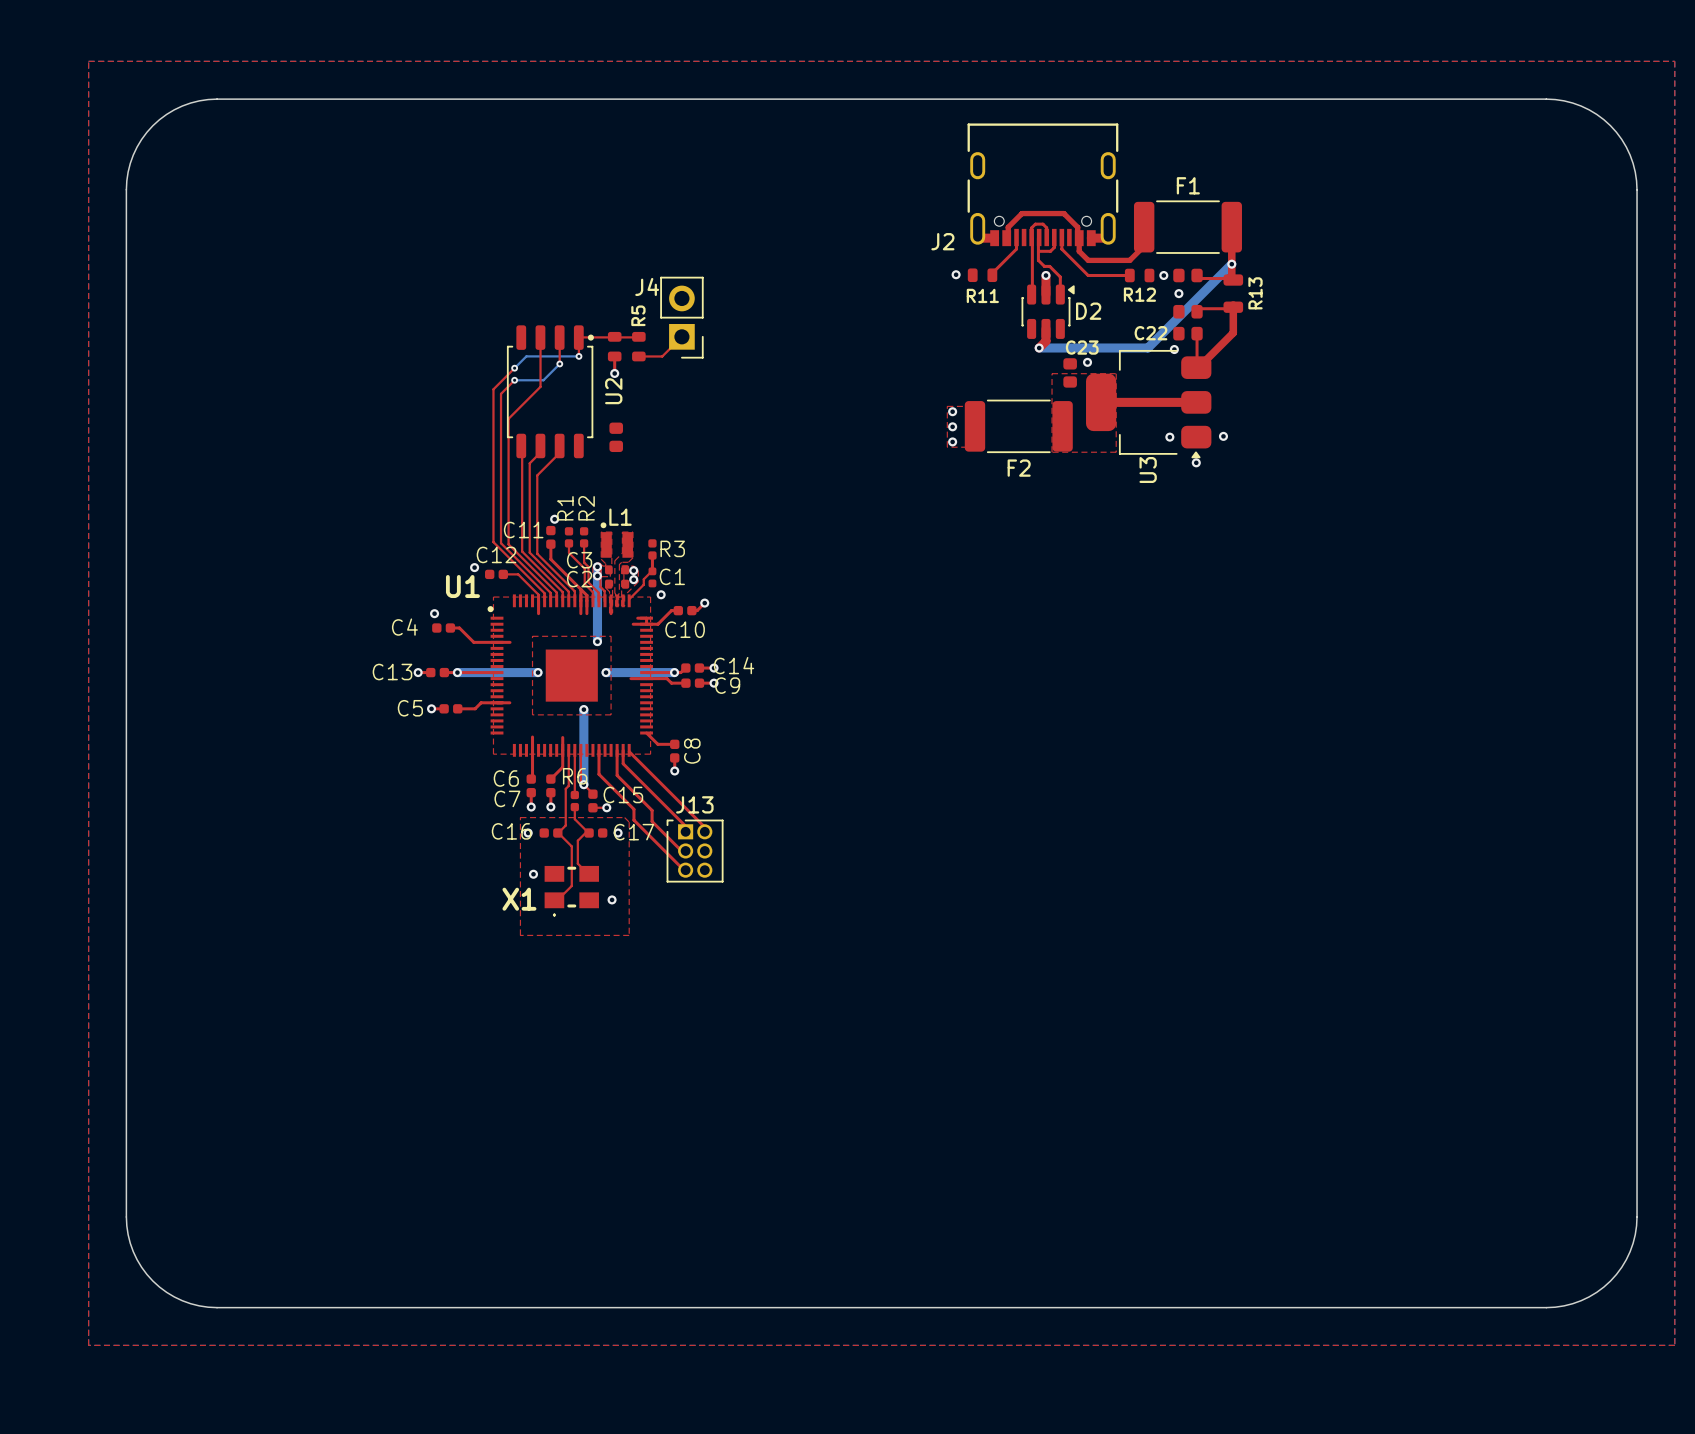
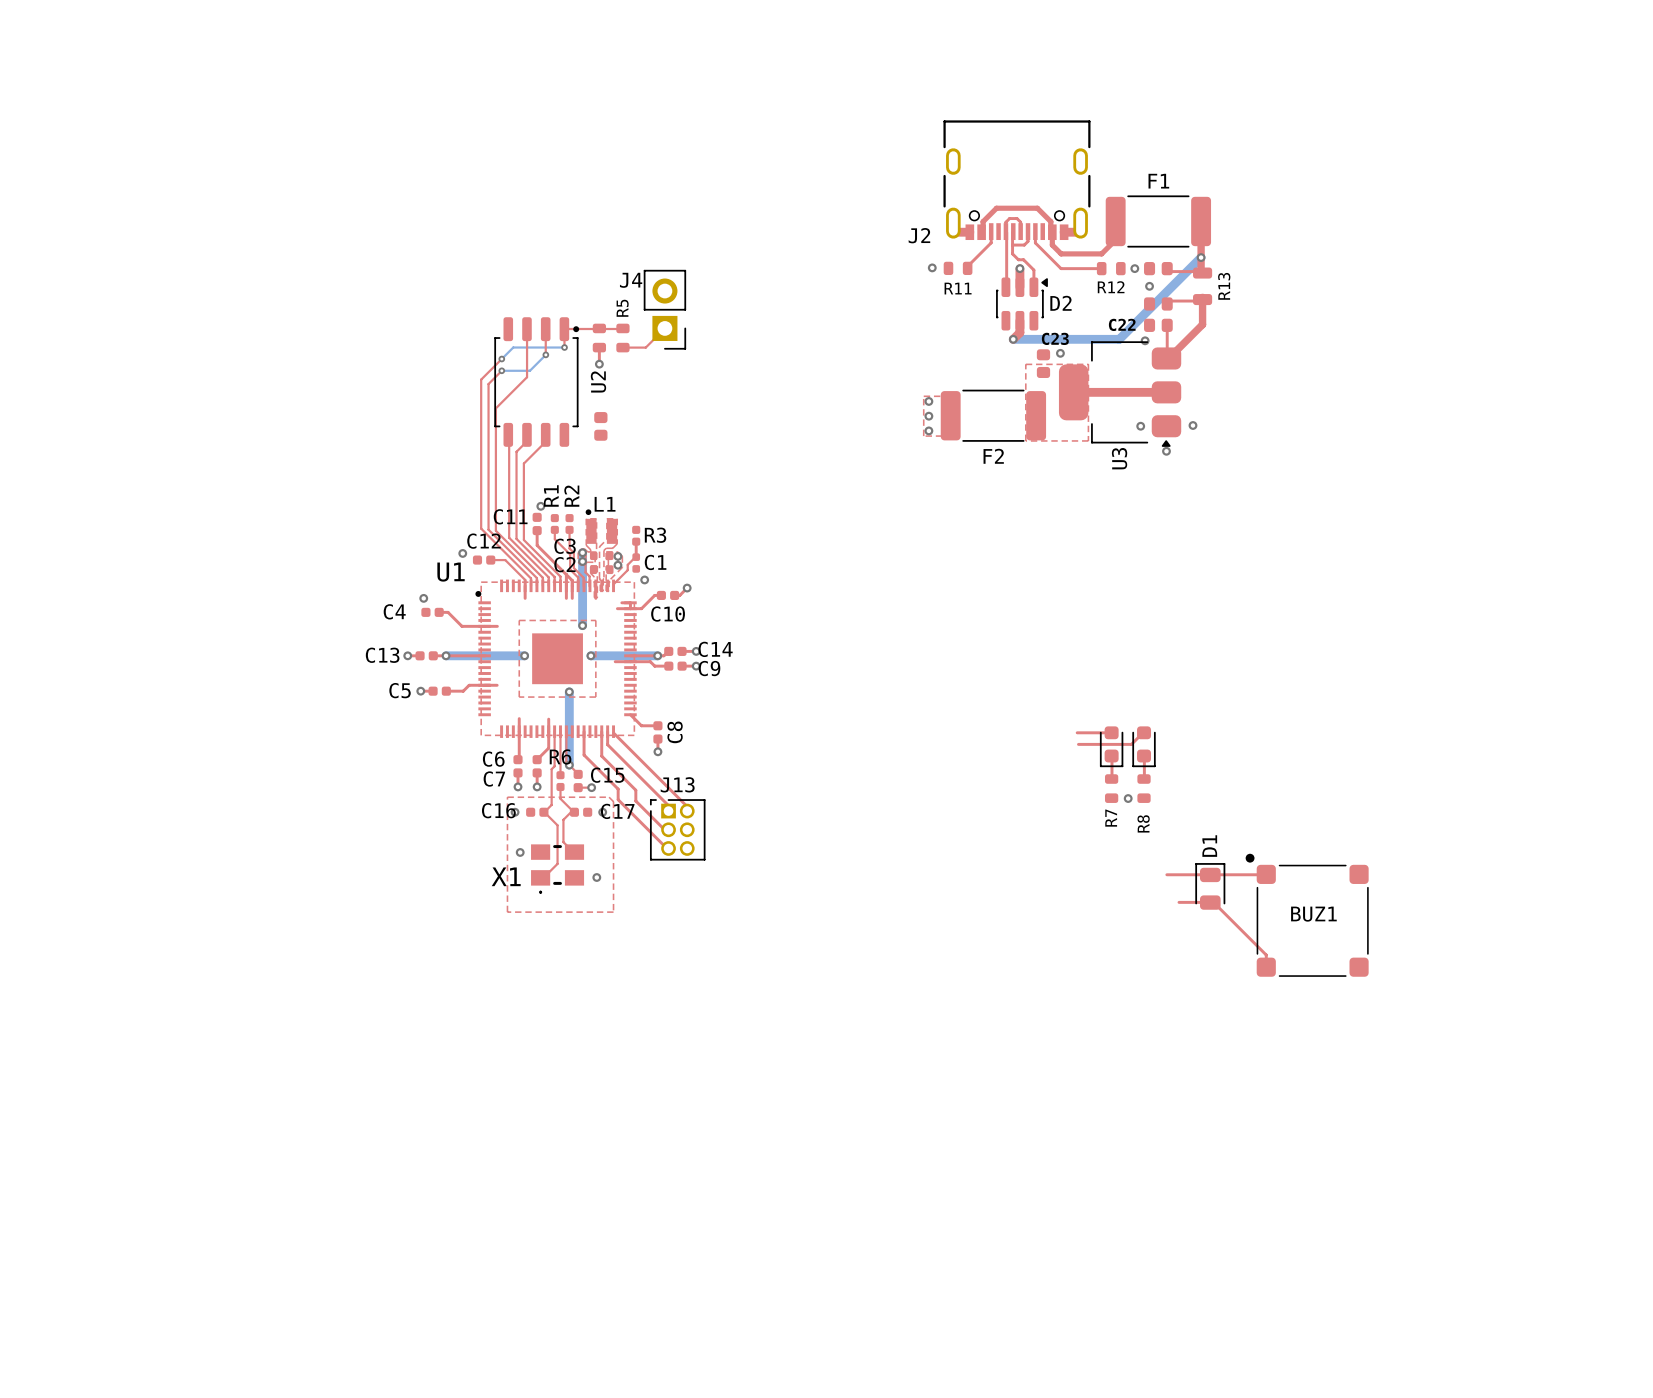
top zone outline: (88, 61) (1674, 61) (1674, 1345) (88, 1345) (88, 61) -> none
board edge: (217, 99) (1546, 99) (1564, 100) (1581, 106) (1603, 119) (1616, 132) (1630, 155) (1635, 172) (1637, 189) (1637, 1216) (1635, 1234) (1630, 1251) (1616, 1274) (1603, 1287) (1581, 1300) (1564, 1305) (1546, 1307) (217, 1307) (199, 1305) (182, 1300) (159, 1287) (146, 1274) (133, 1251) (128, 1234) (126, 1216) (126, 189) (128, 172) (133, 155) (141, 139) (152, 125) (166, 114) (182, 106) (199, 100) (217, 99) -> none
top track: none -> (1077, 732) (1111, 732)
top track: none -> (1142, 733) (1131, 744) (1078, 744)
part: none -> (1111, 746)
part: none -> (1144, 746)
top track: none -> (1111, 756) (1111, 779)
top track: none -> (1144, 756) (1144, 779)
R7: none -> (1111, 788)
R8: none -> (1144, 788)
via: none -> (1128, 798)
top track: none -> (1166, 874) (1265, 874)
D1: none -> (1210, 886)
top track: none -> (1179, 902) (1213, 902) (1266, 955) (1266, 967)
BUZ1: none -> (1307, 915)

